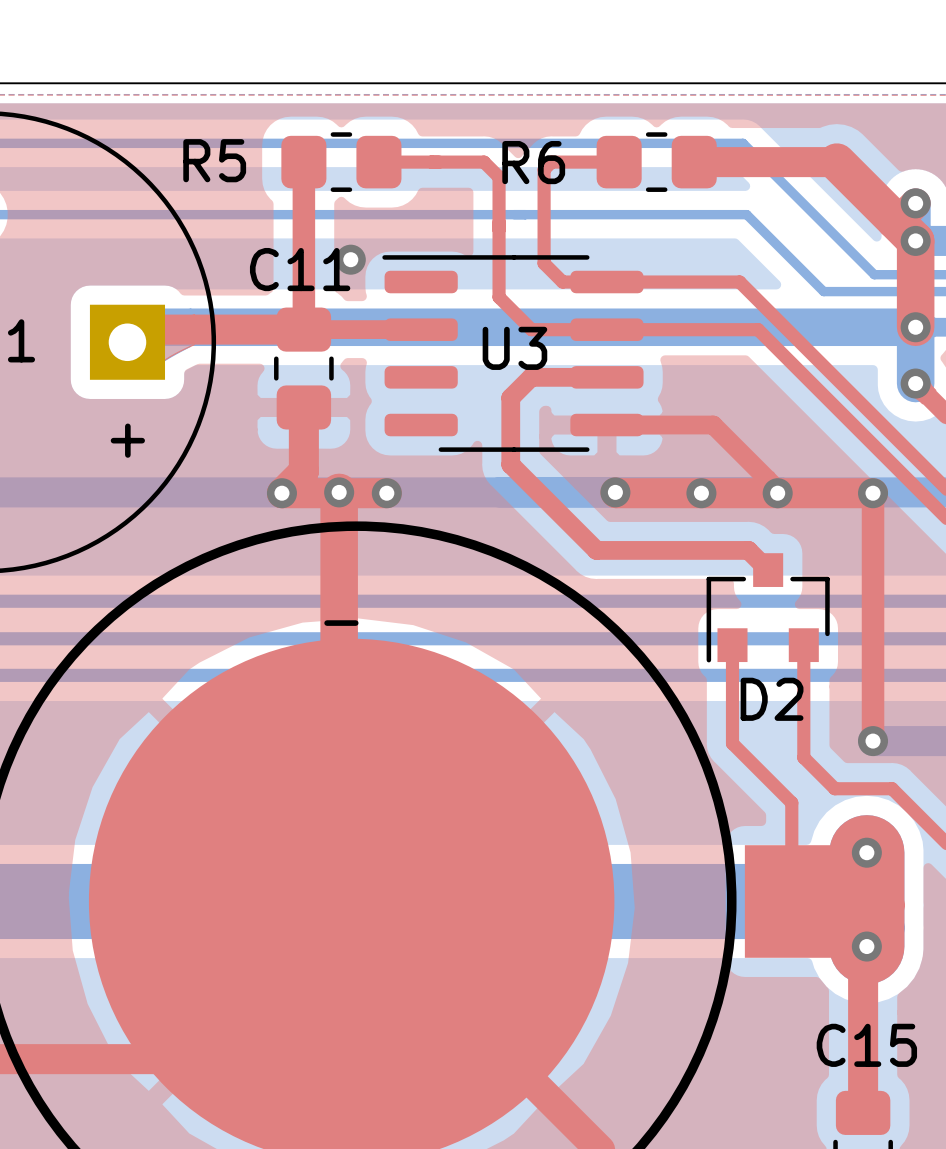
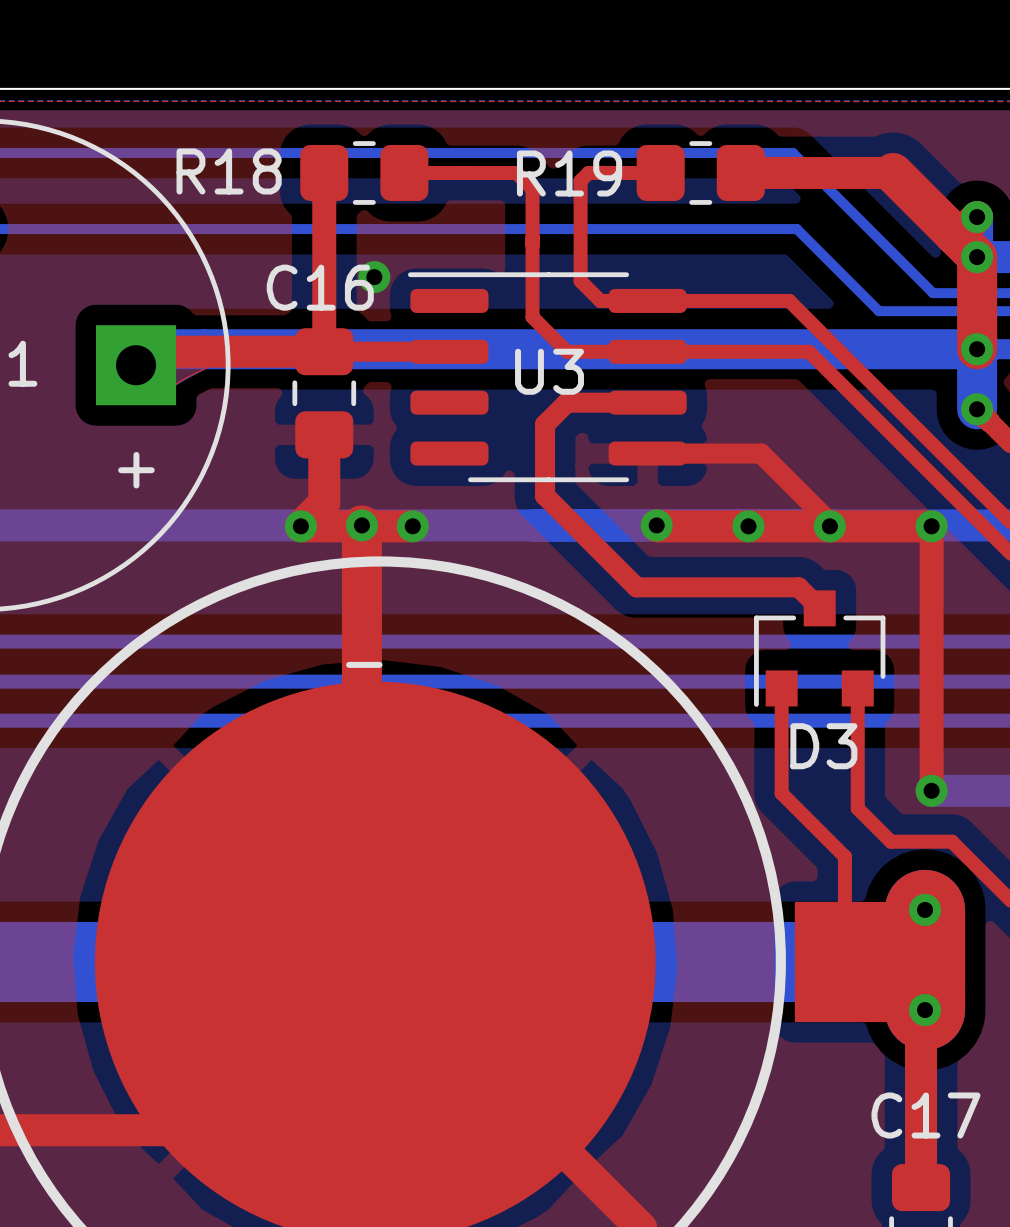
R5 name: R5 (214, 160) -> R18 (229, 171)
R6 name: R6 (533, 162) -> R19 (569, 173)
C11 name: C11 (300, 269) -> C16 (320, 287)
D2 name: D2 (772, 699) -> D3 (823, 746)
C15 name: C15 (866, 1045) -> C17 (925, 1115)

